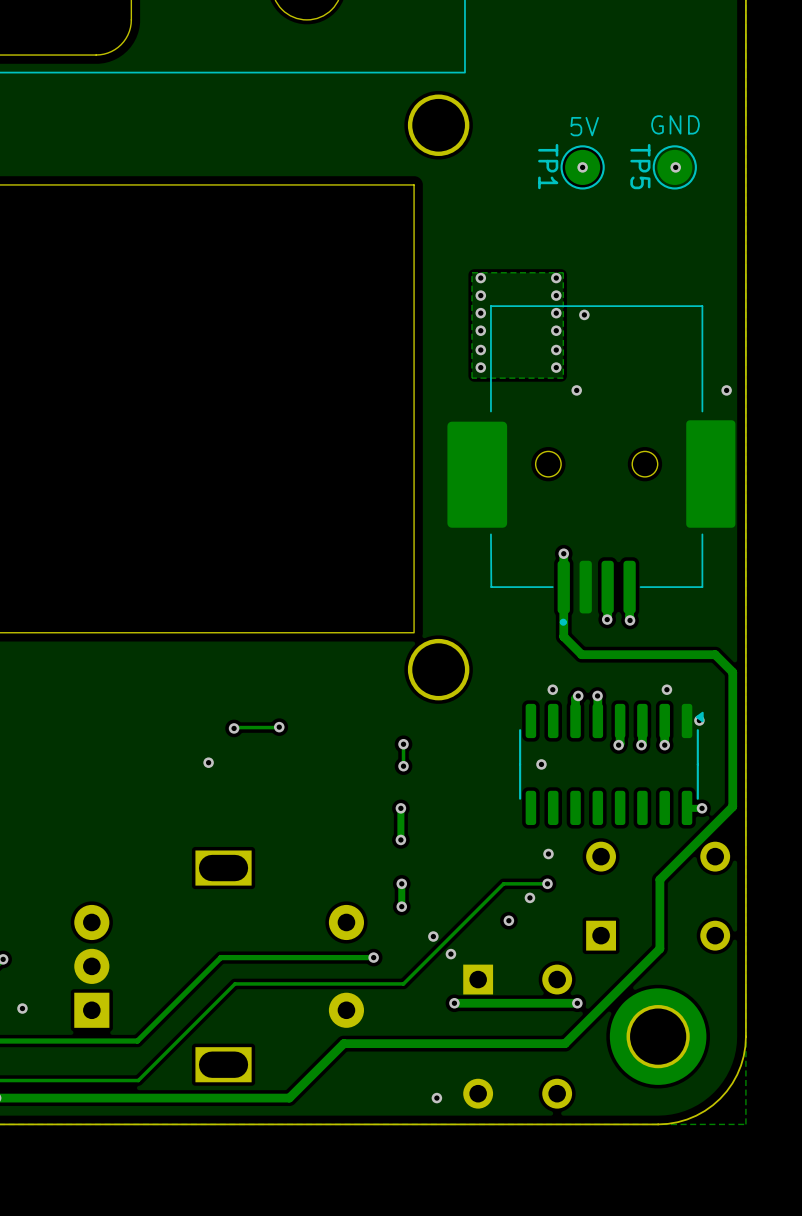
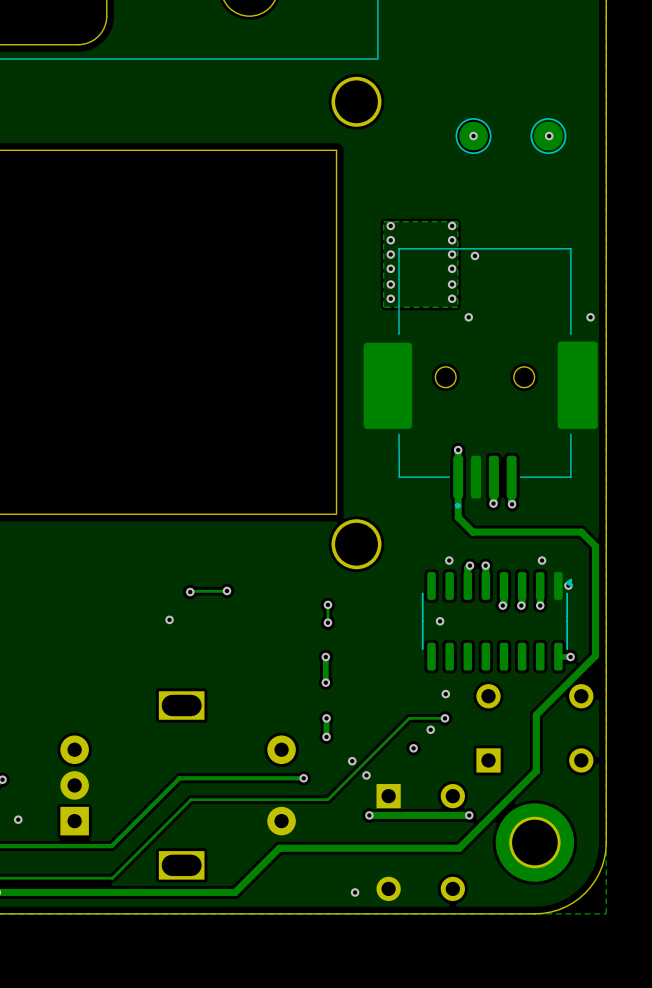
text: GND (675, 124) -> none
text: 5V (584, 126) -> none
TP1 name: TP1 (548, 166) -> none
TP5 name: TP5 (640, 166) -> none

